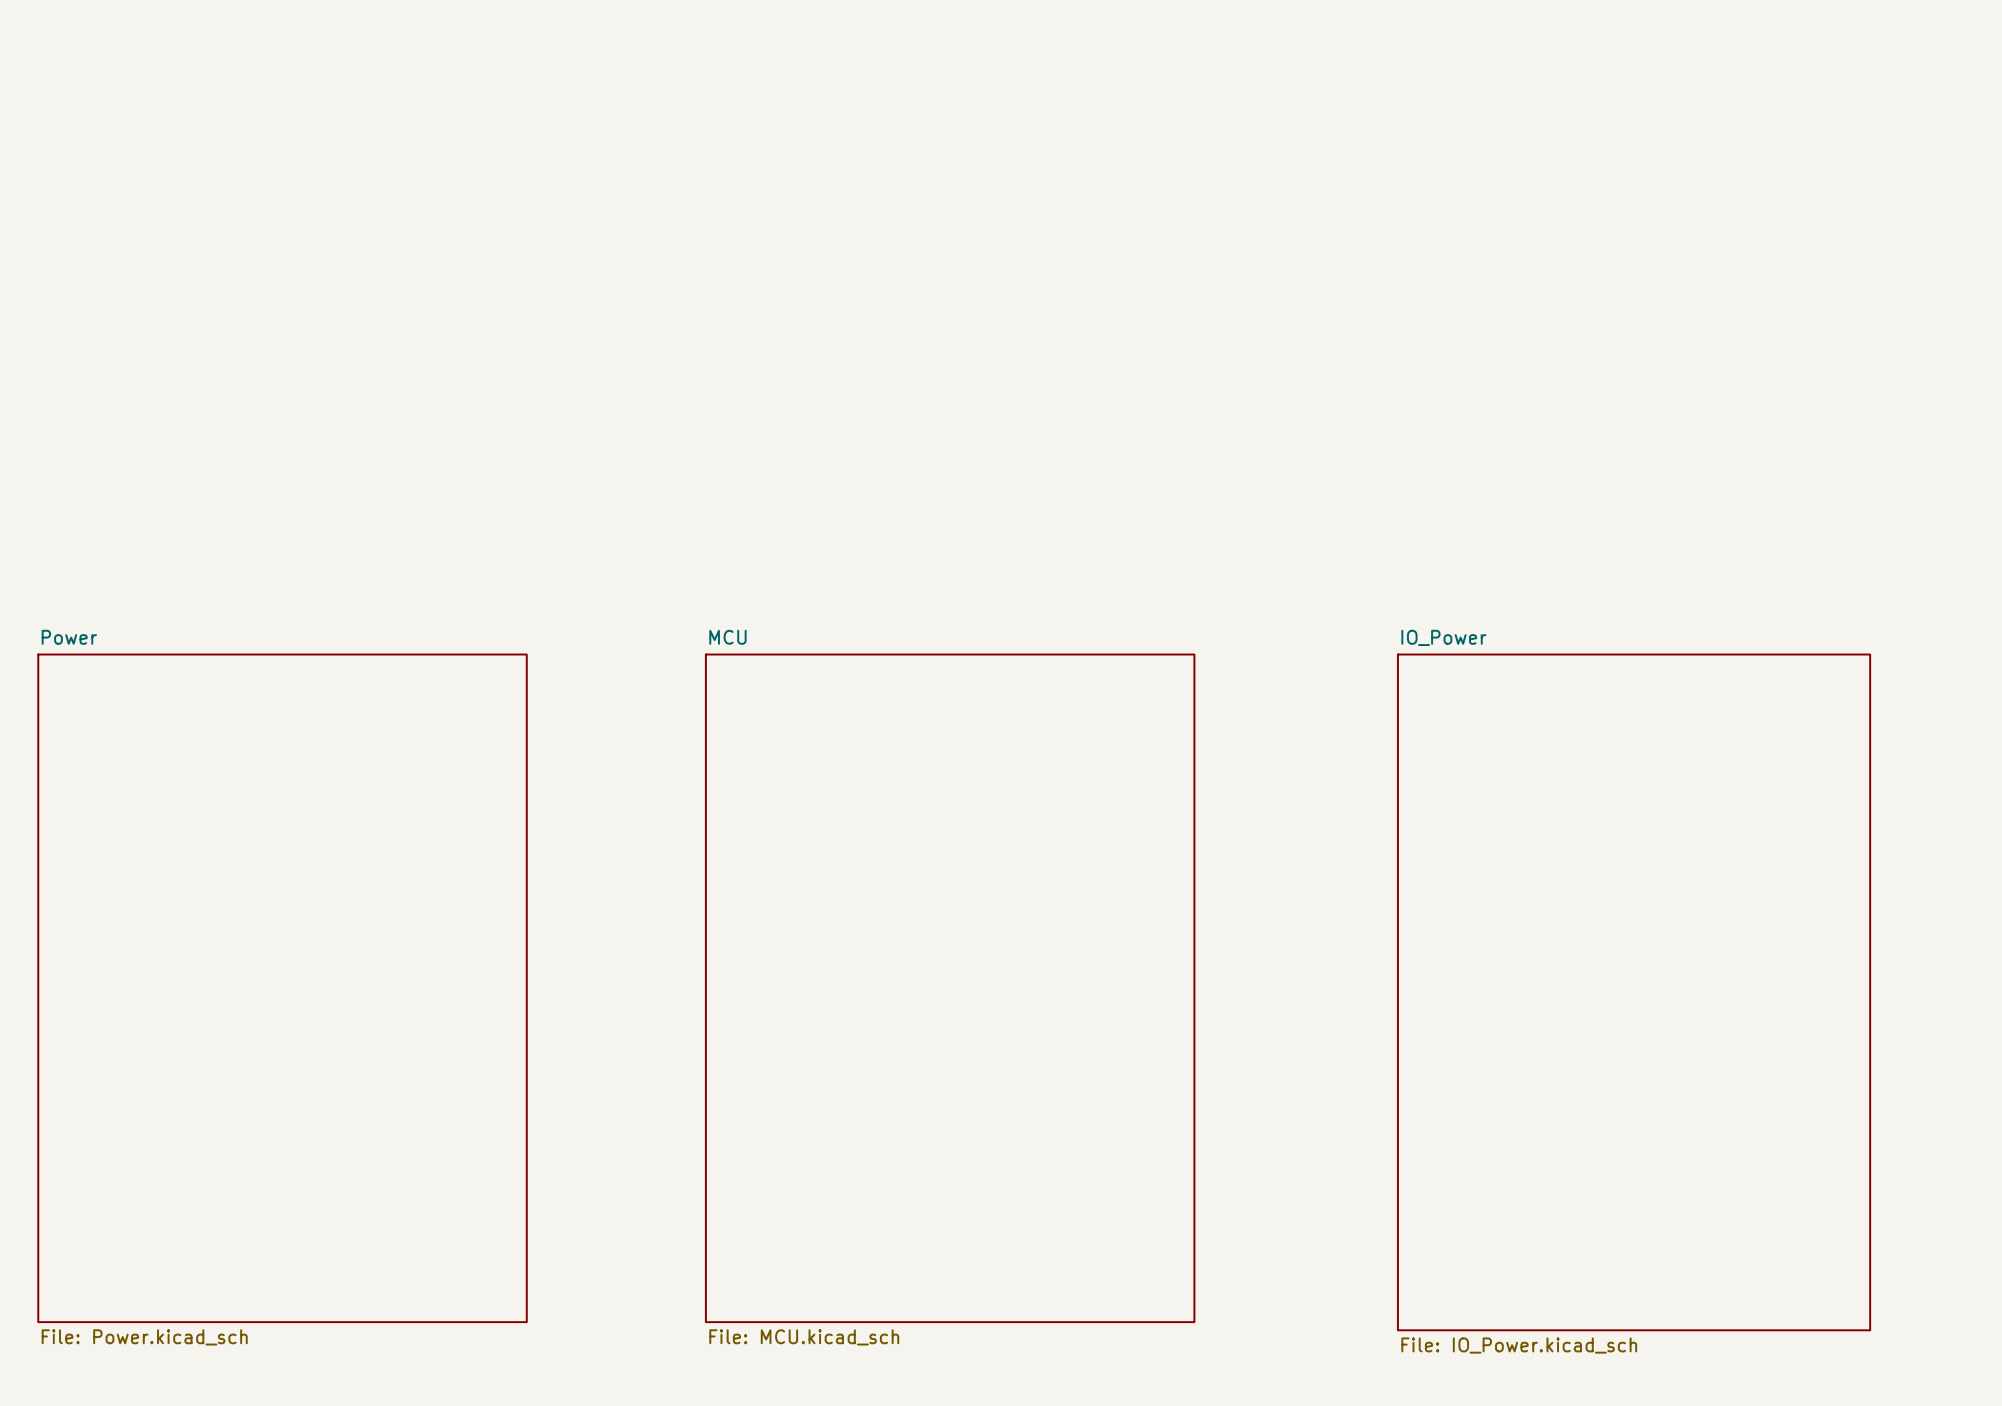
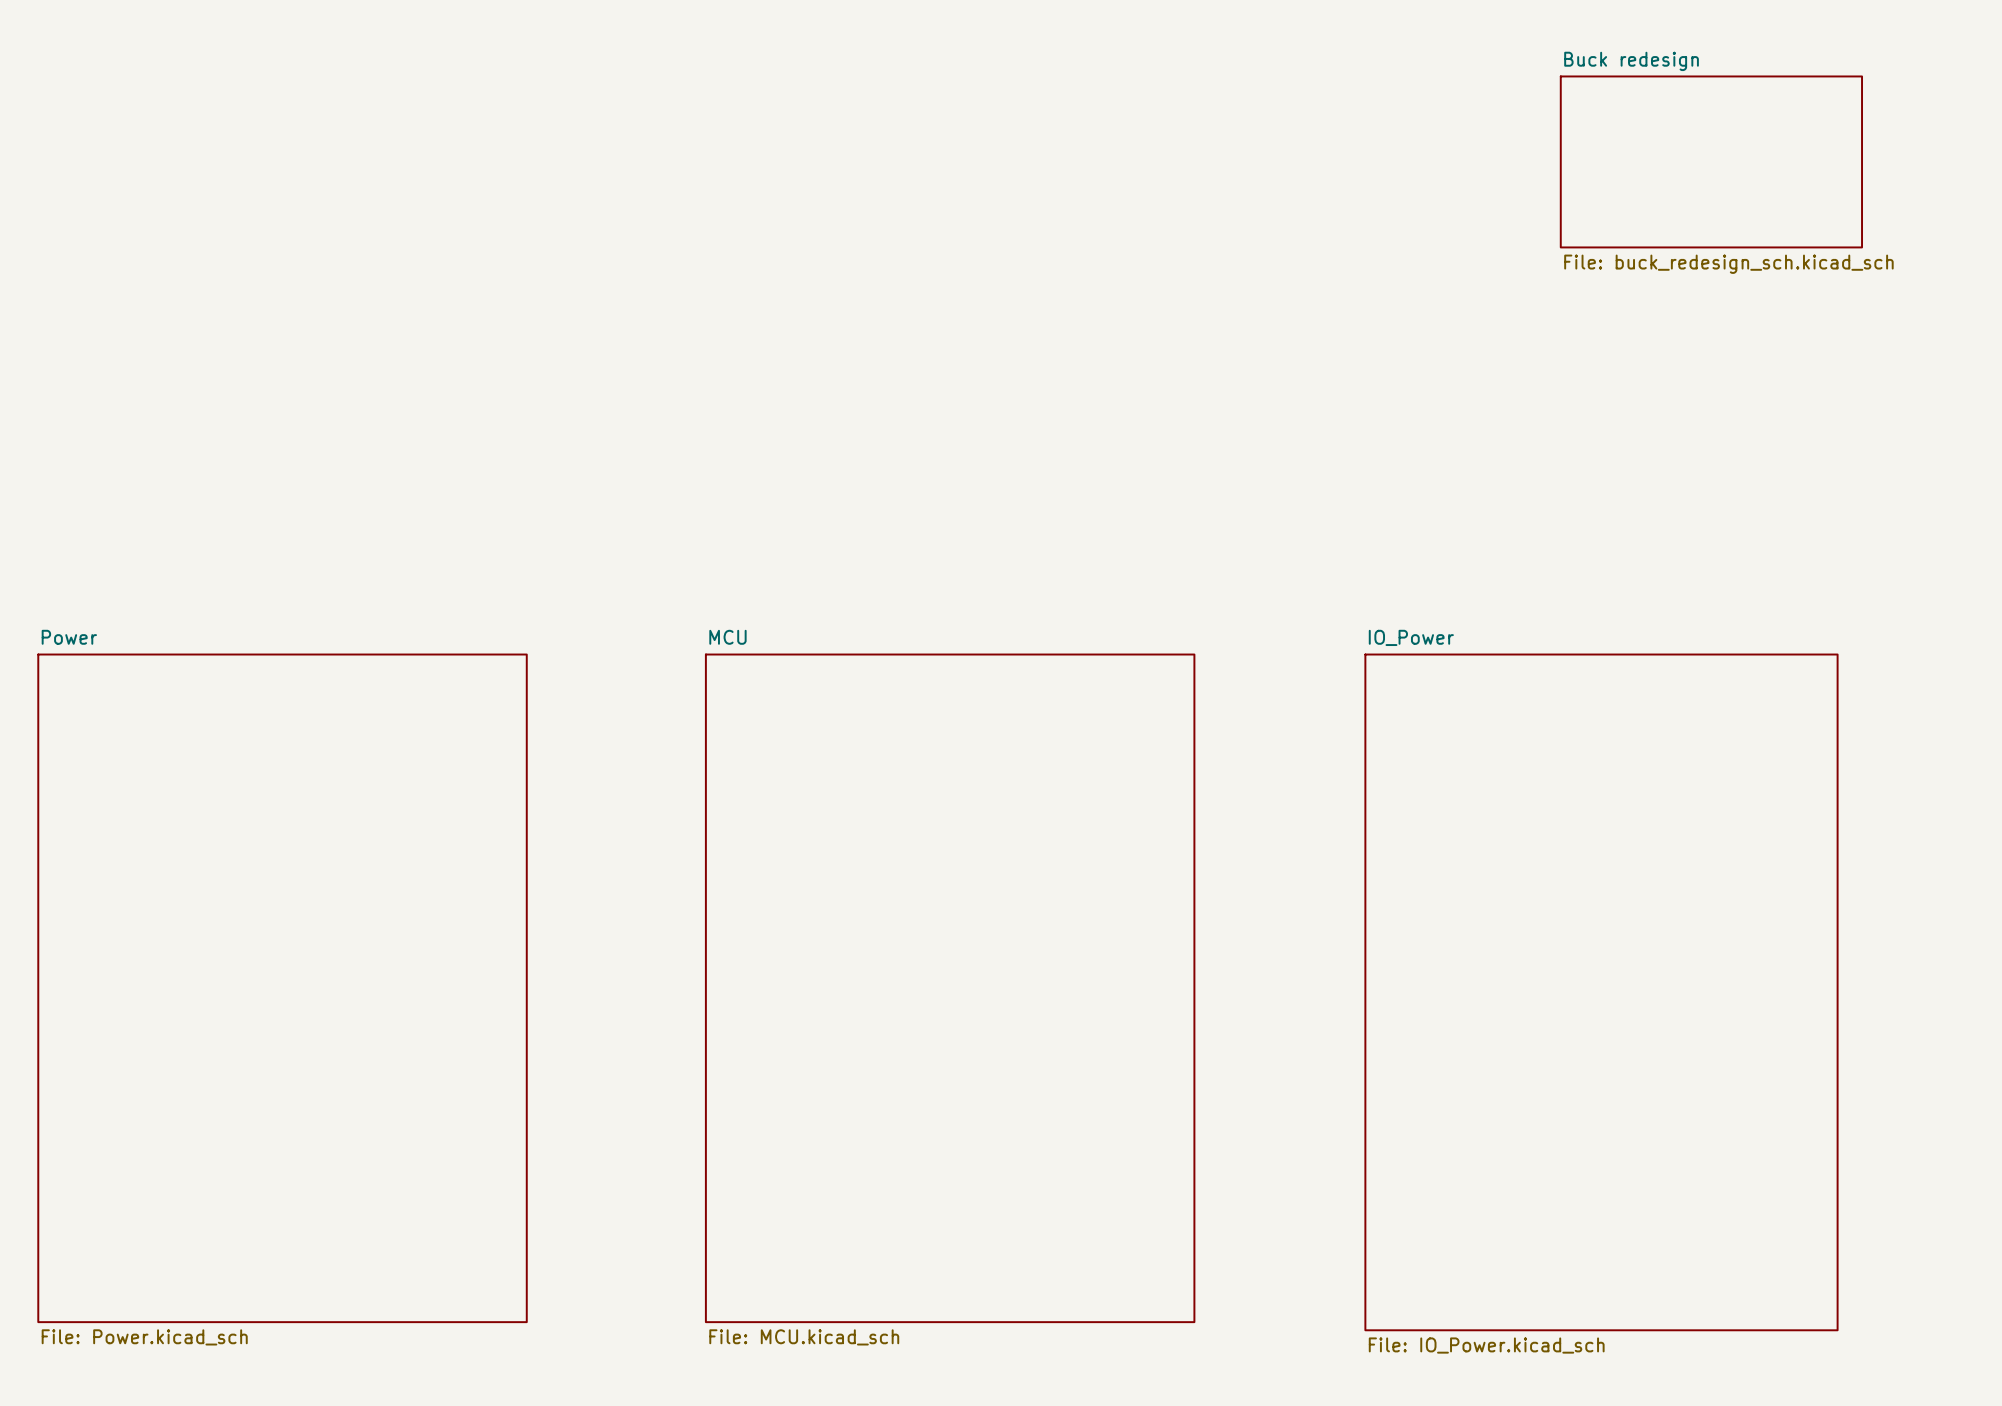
sheet Buck redesign: none -> File: buck_redesign_sch.kicad_sch (1711, 161)
sheet IO_Power position: (1634, 992) -> (1601, 992)

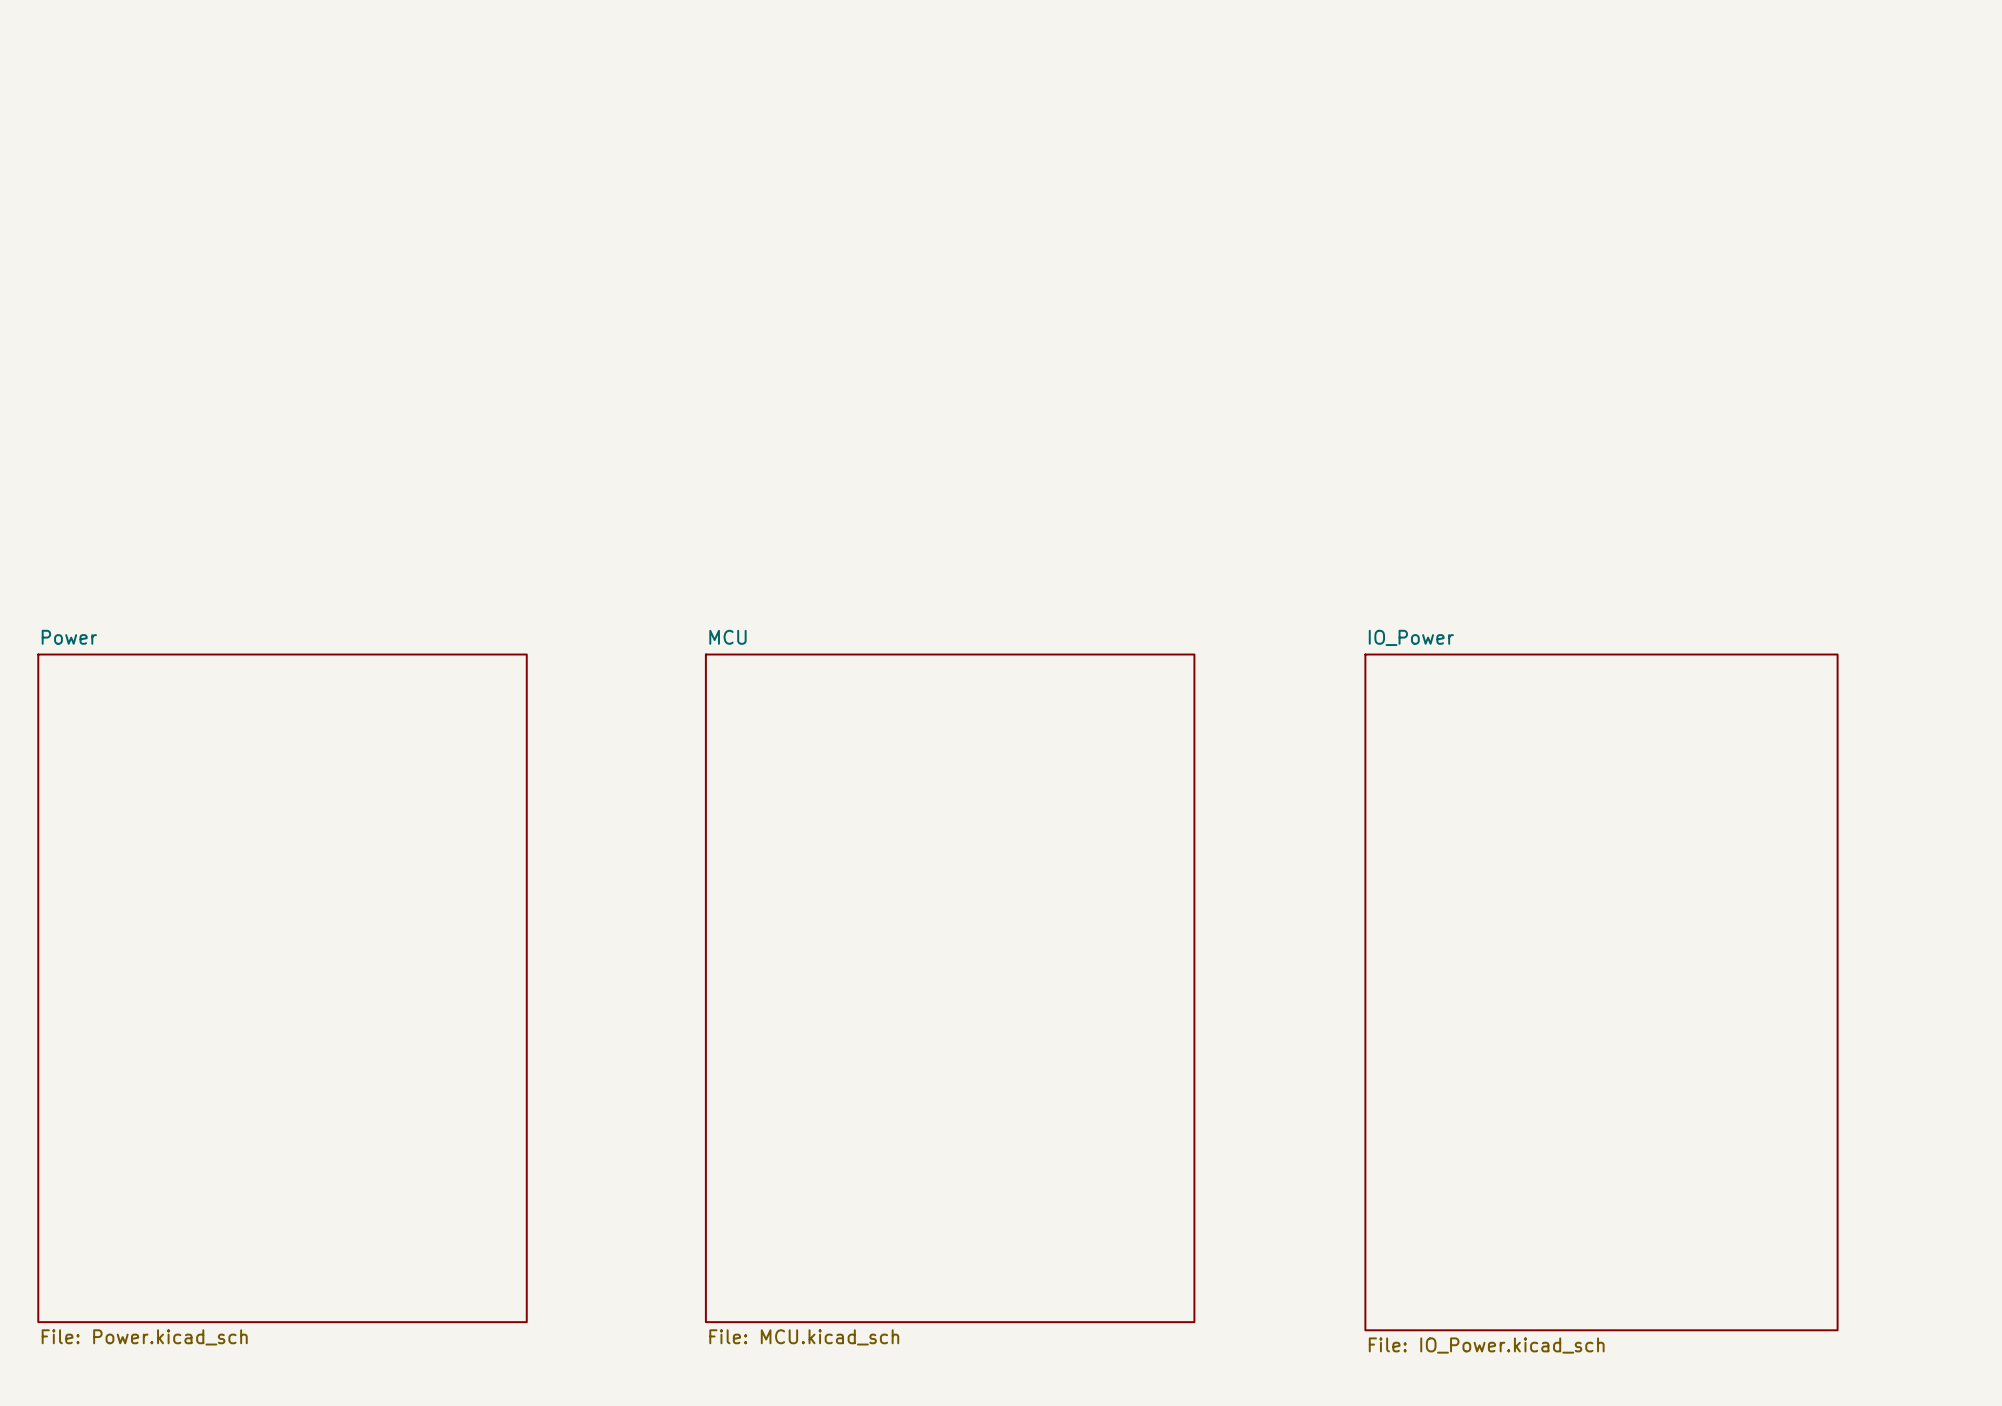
sheet Buck redesign: File: buck_redesign_sch.kicad_sch (1711, 161) -> none

